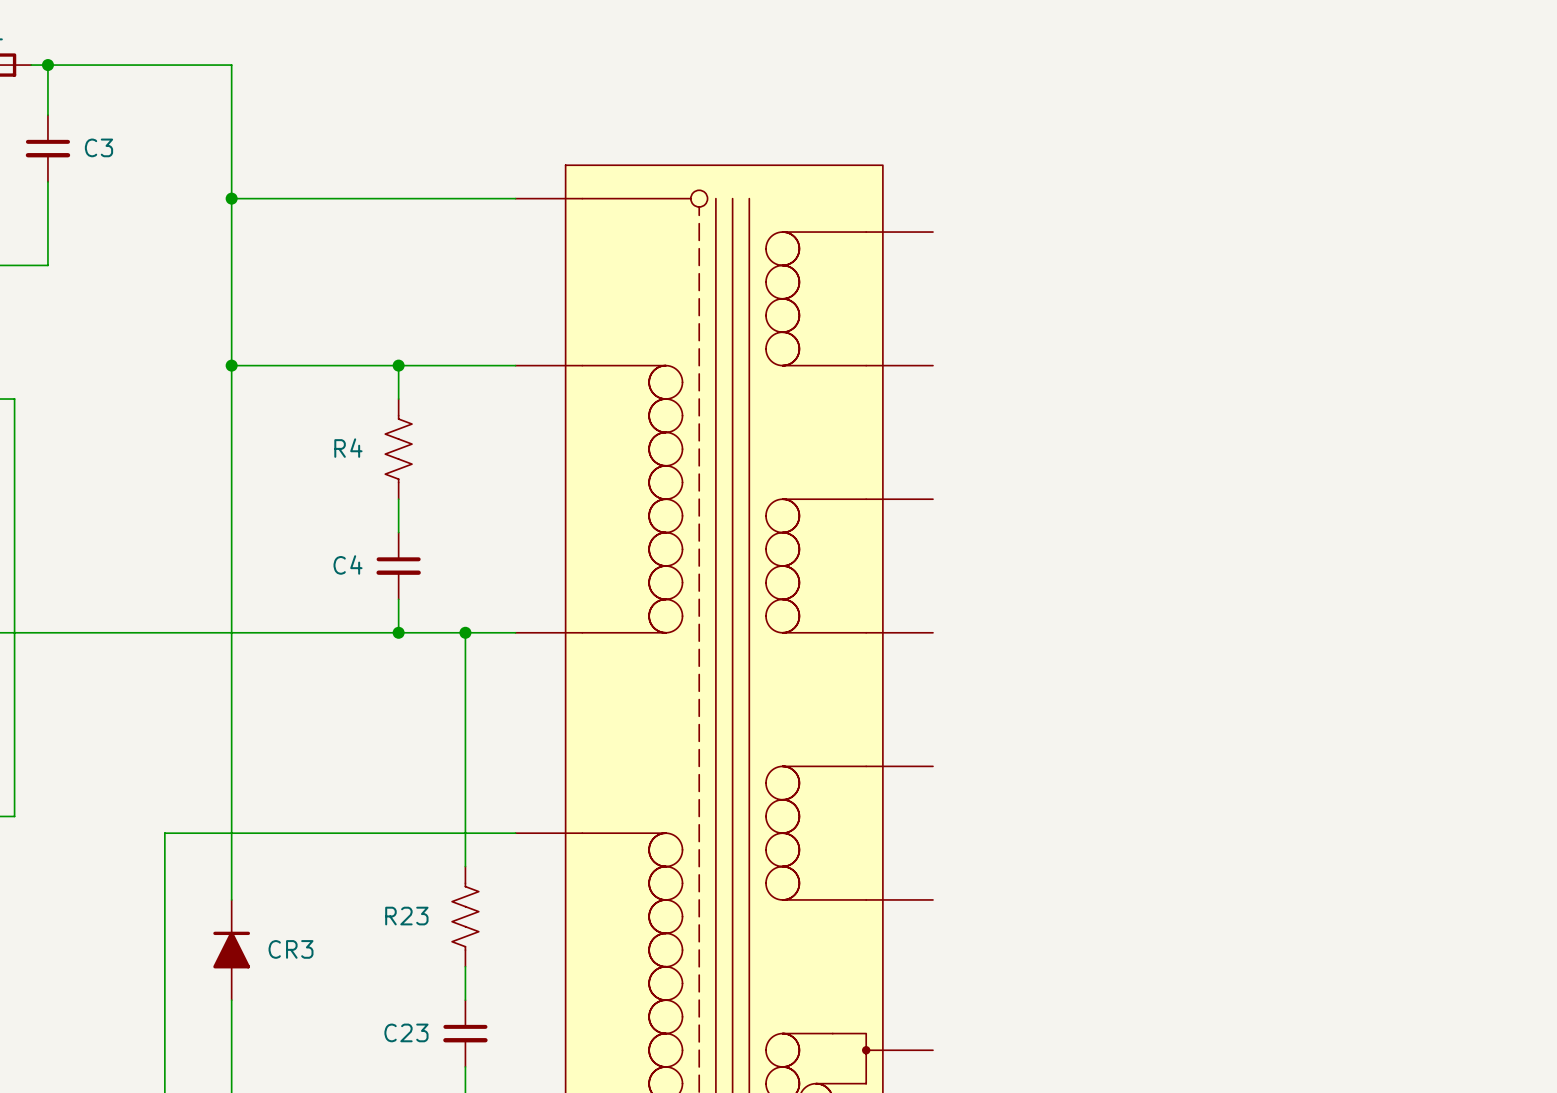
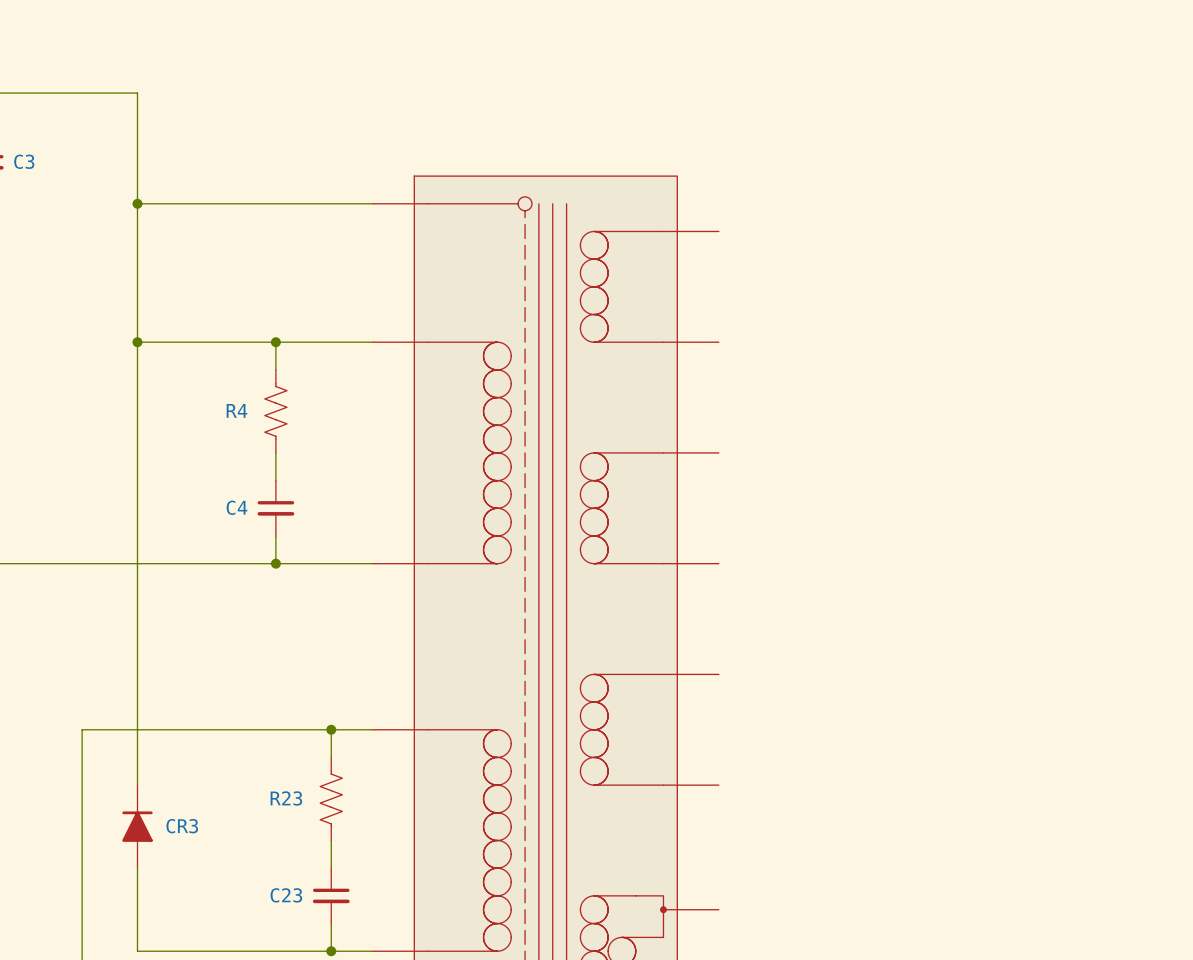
wire: (465, 632) (465, 833) -> none
junction: (465, 632) -> none
junction: none -> (331, 729)

